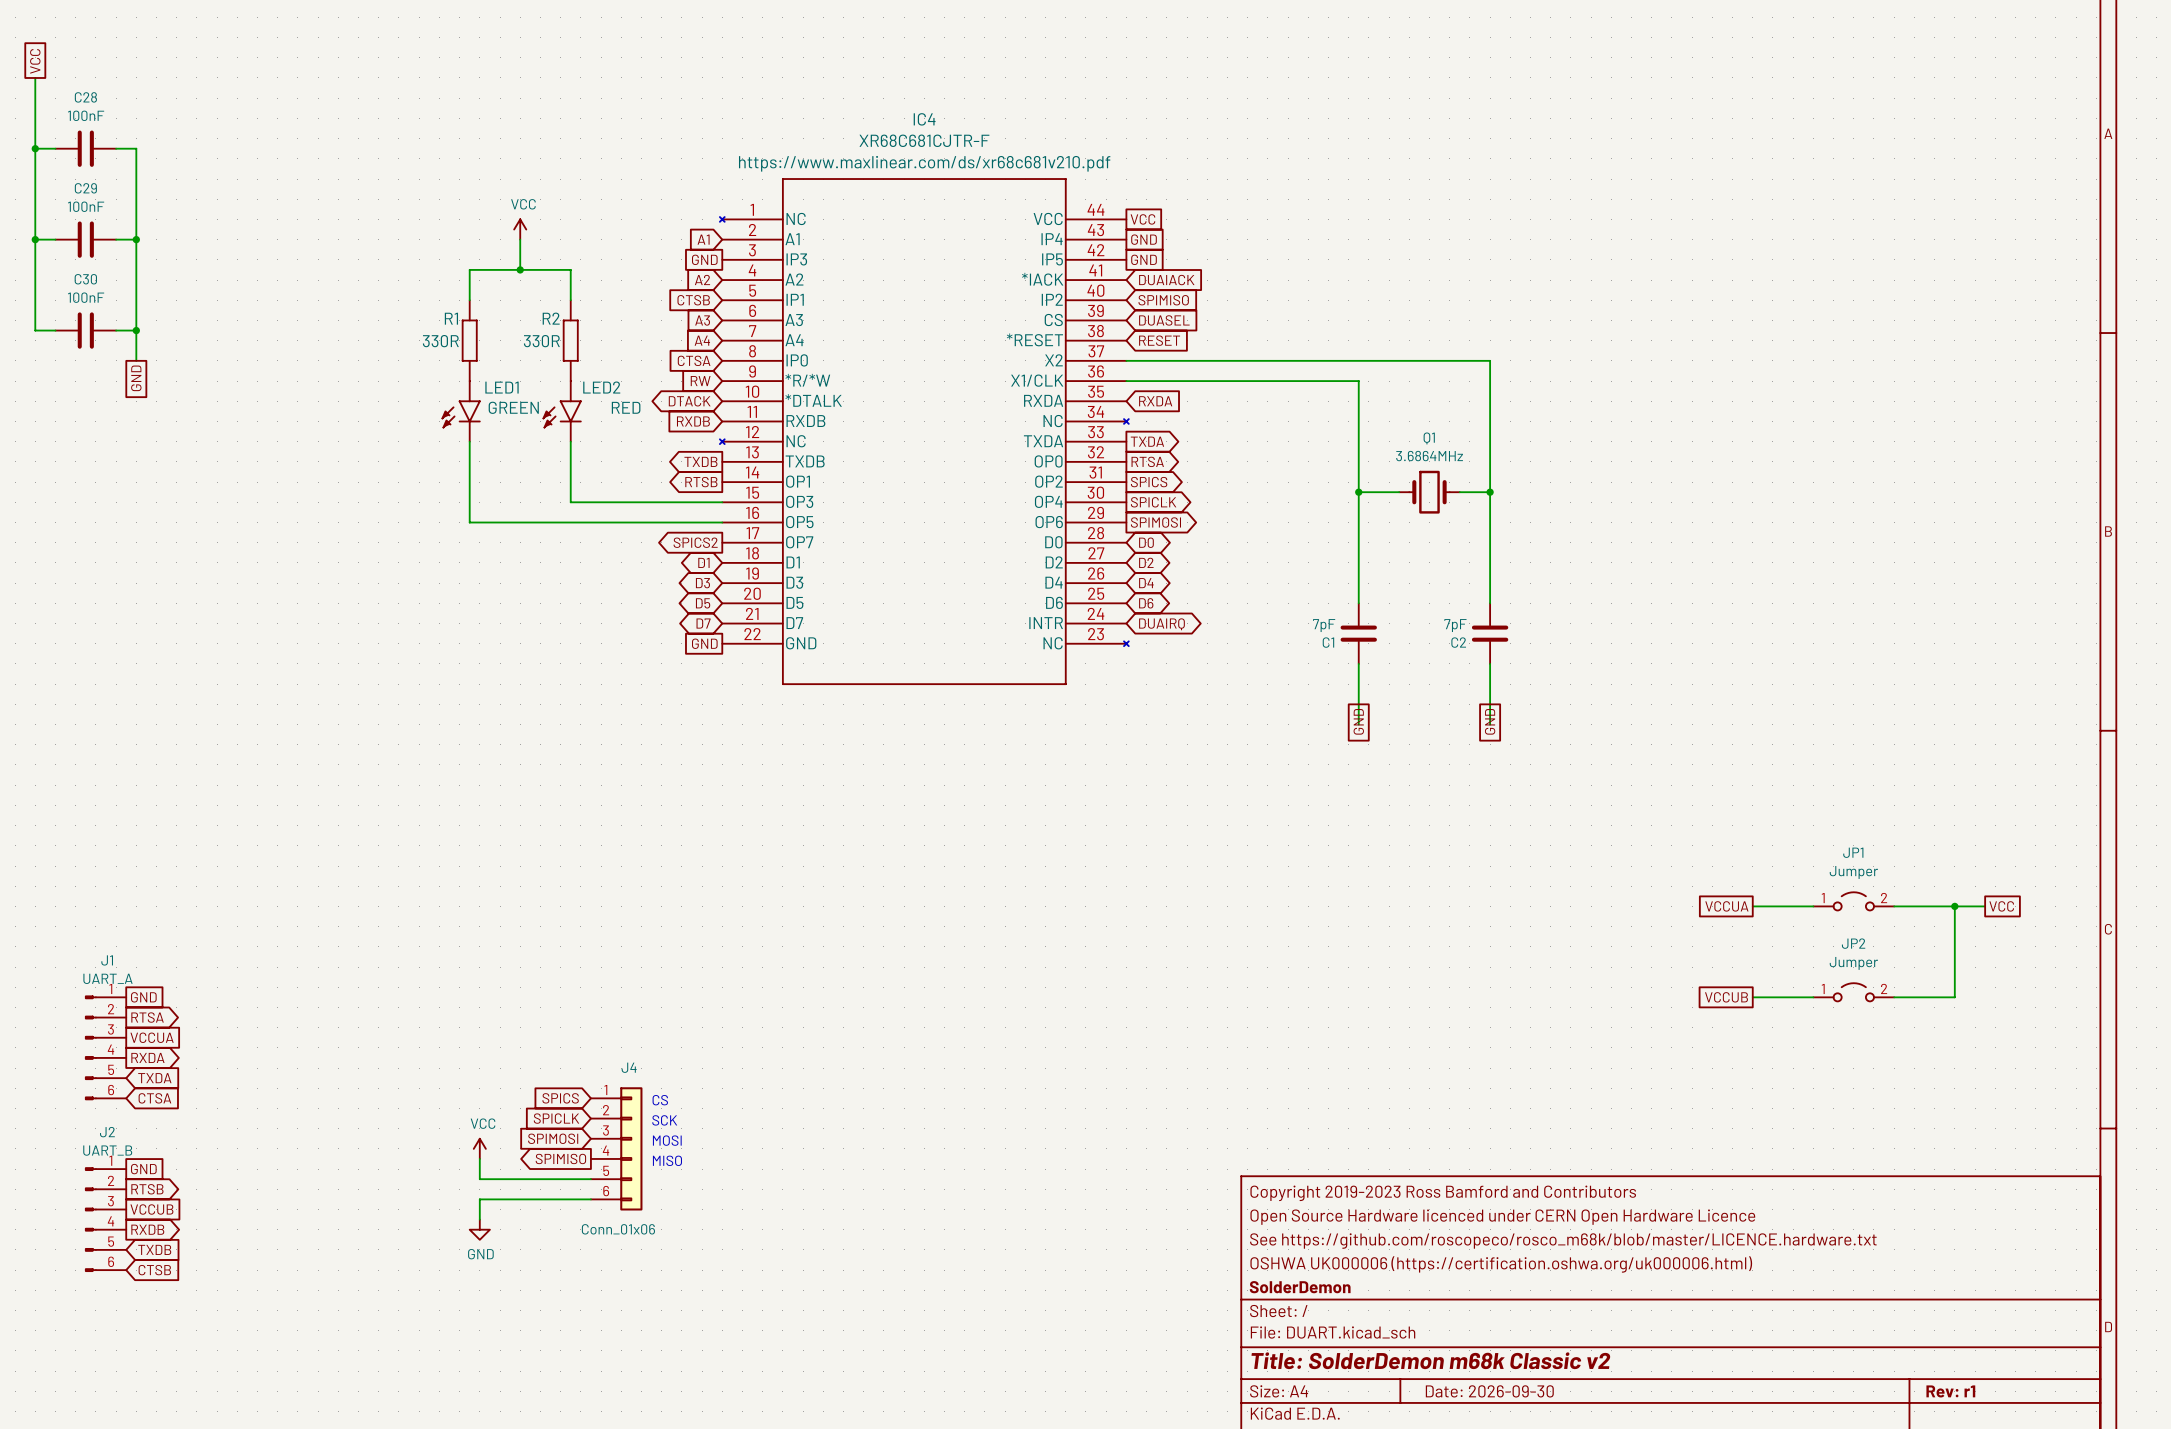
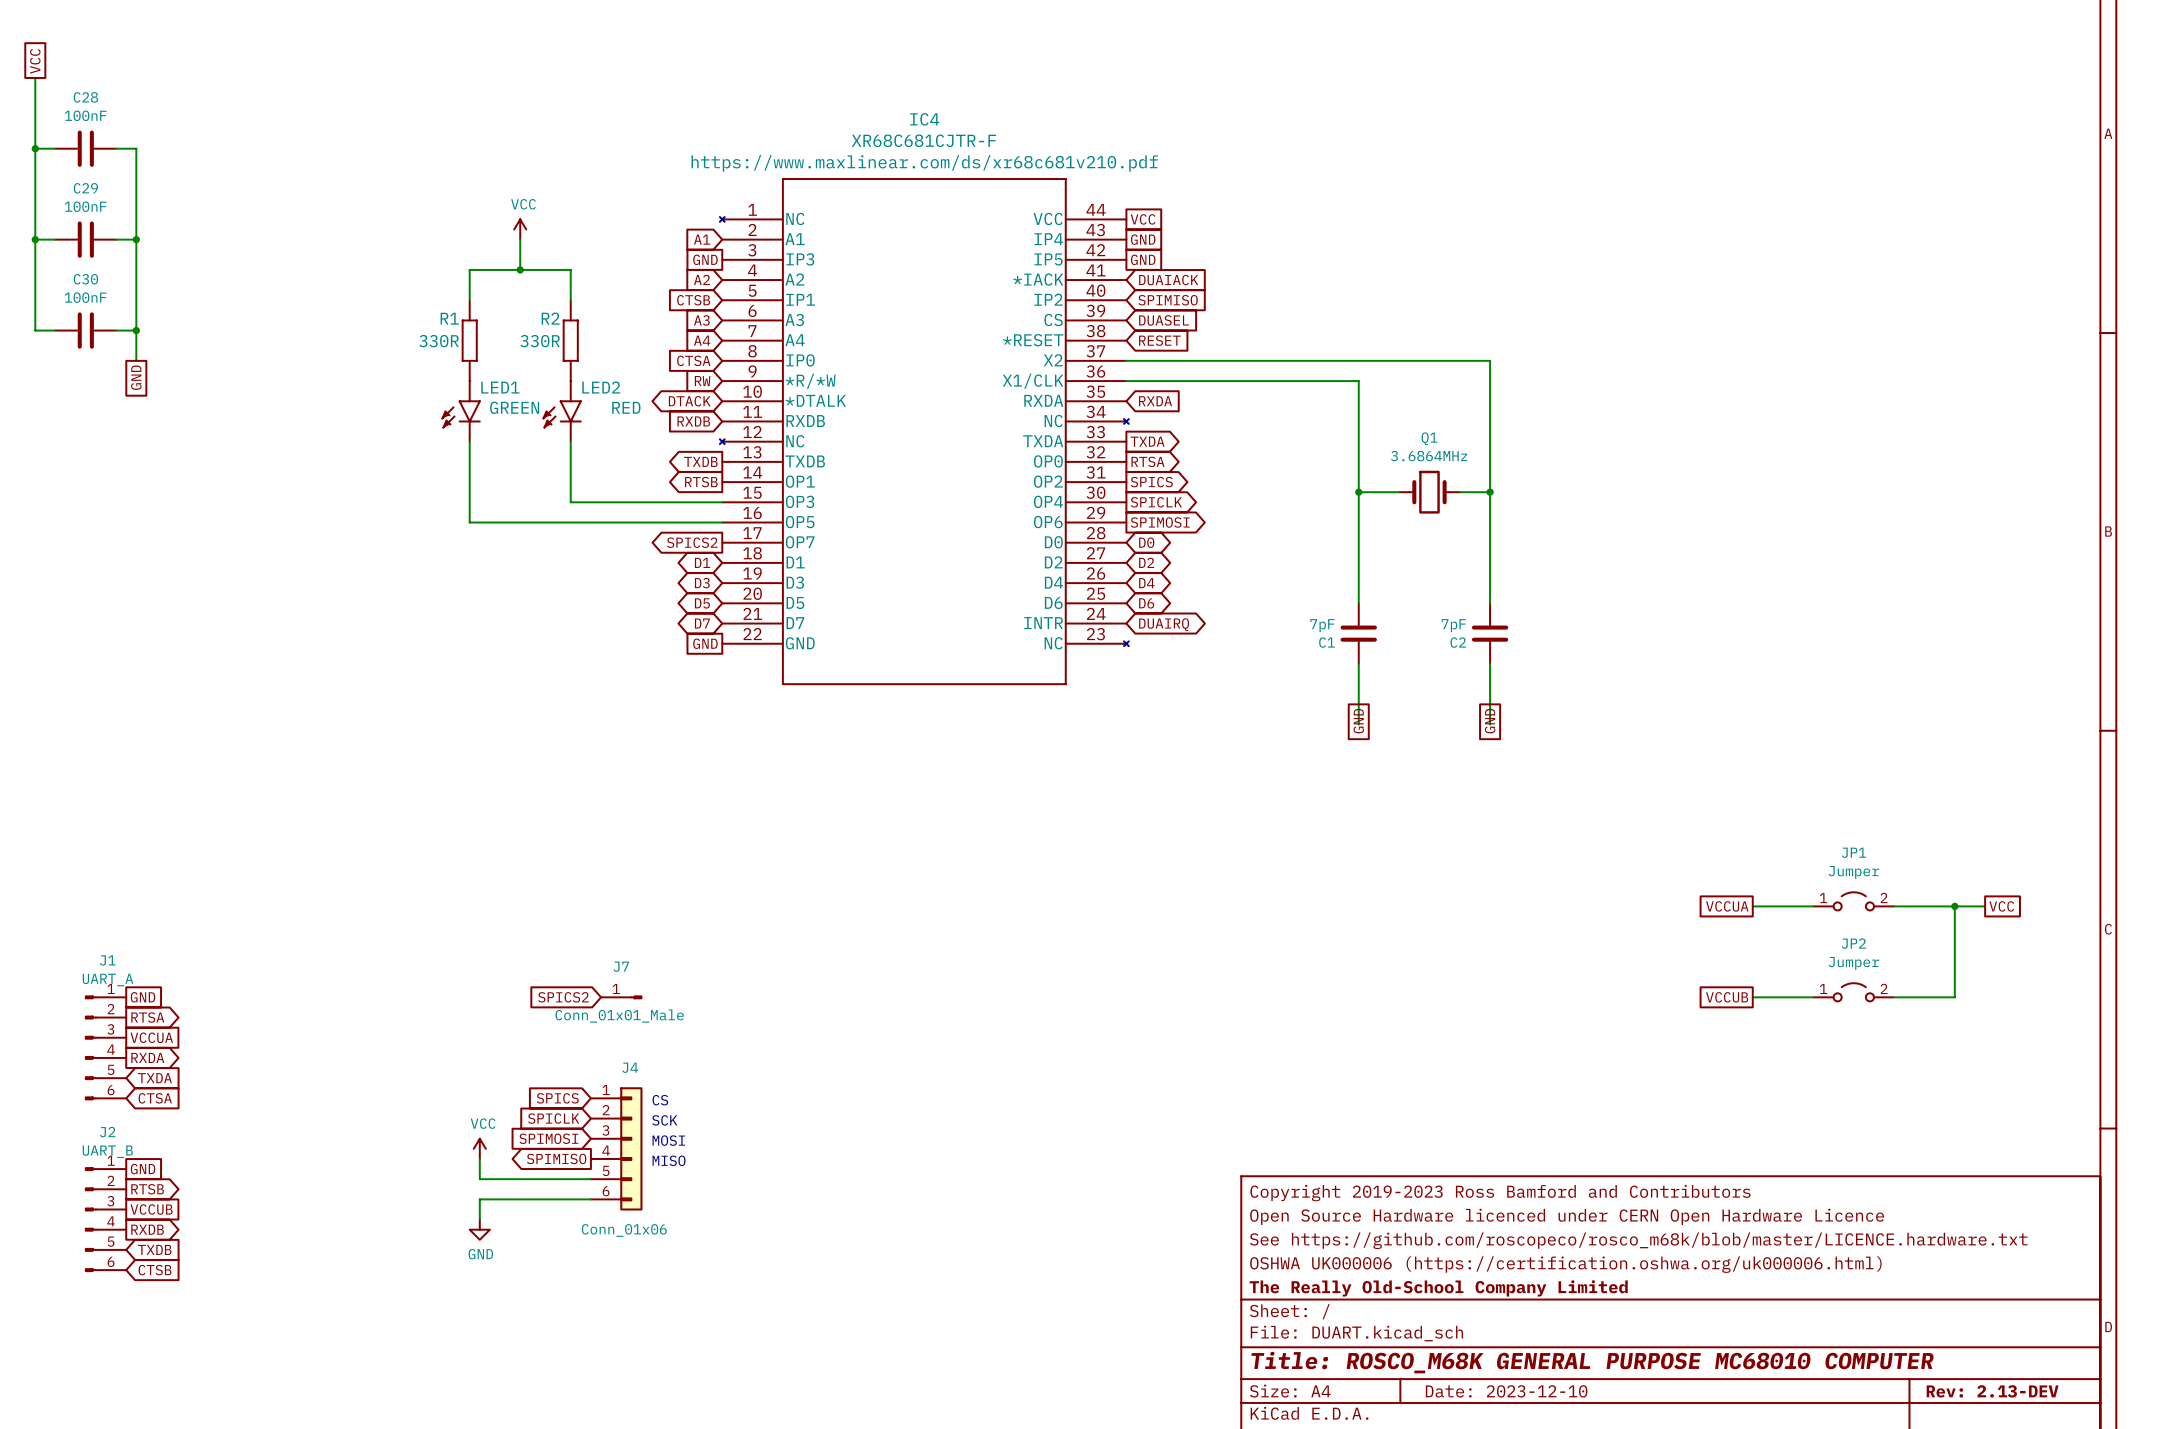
global label: none -> SPICS2 (563, 997)
J7: none -> Conn_01x01_Male (621, 997)
title block: SolderDemon (1300, 1287) -> The Really Old-School Company Limited (1438, 1288)
title block: Title: SolderDemon m68k Classic v2 (1430, 1360) -> Title: ROSCO_M68K GENERAL PURPOSE MC68010 COMPUTER (1592, 1362)
title block: Date: 2026-09-30 (1489, 1391) -> Date: 2023-12-10 (1506, 1391)
title block: Rev: r1 (1950, 1391) -> Rev: 2.13-DEV (1992, 1391)

